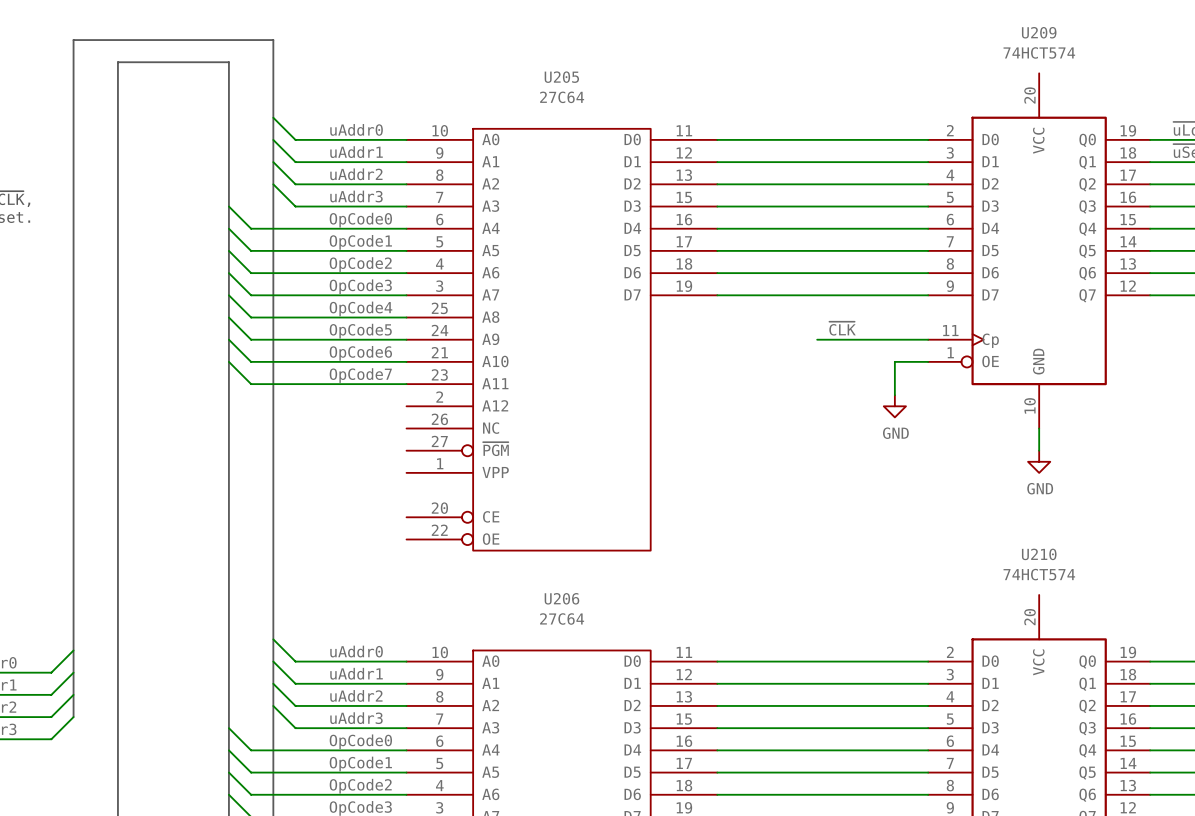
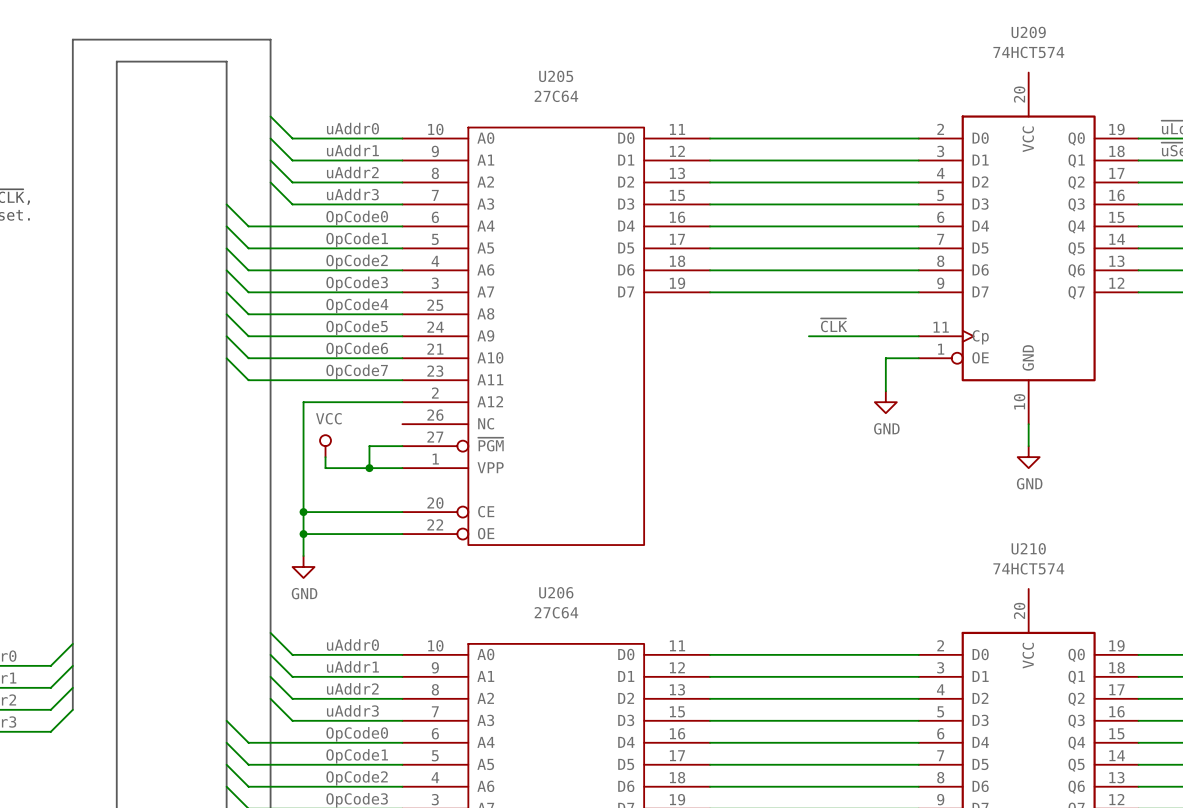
wire: none -> (402, 402) (303, 402) (303, 556)
power symbol: none -> VCC (325, 446)
wire: none -> (402, 446) (369, 446) (369, 468)
wire: none -> (325, 457) (325, 468) (402, 468)
junction: none -> (369, 468)
wire: none -> (303, 512) (402, 512)
junction: none -> (303, 512)
wire: none -> (303, 534) (402, 534)
junction: none -> (303, 534)
power symbol: none -> GND (303, 567)

